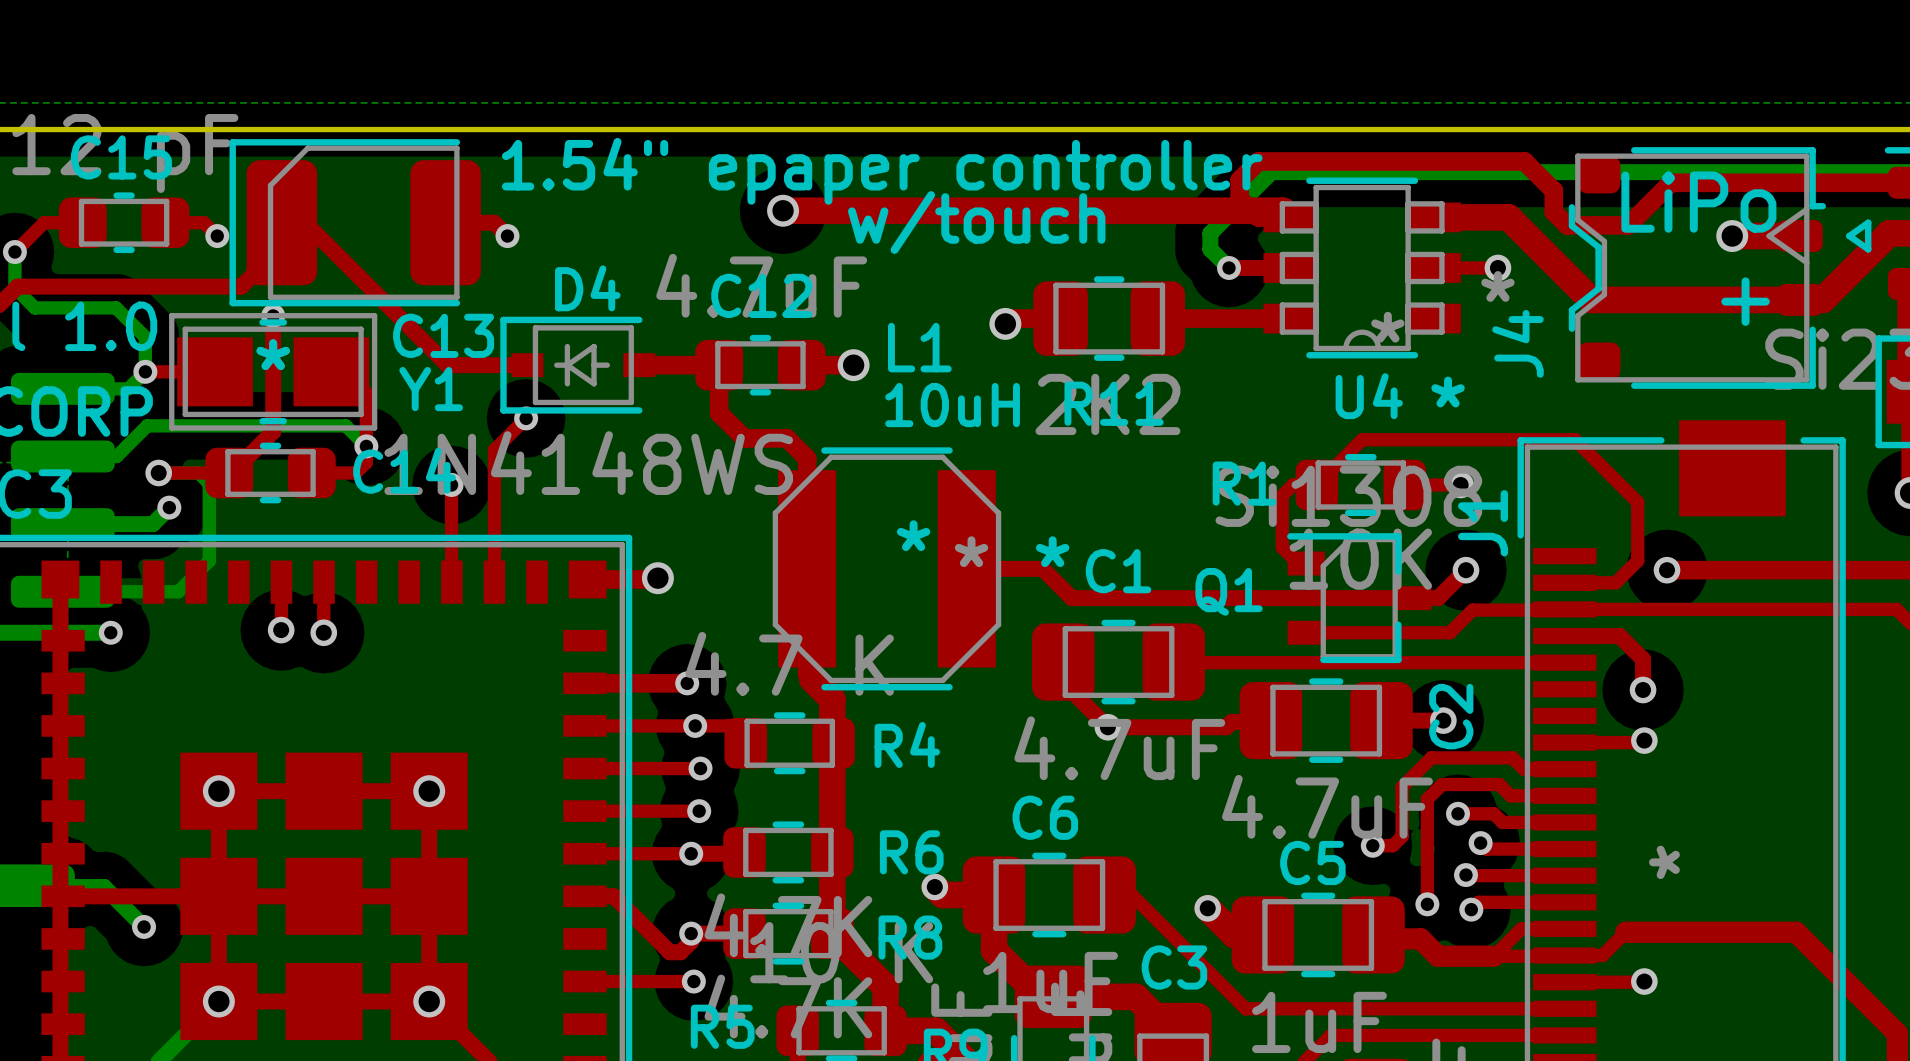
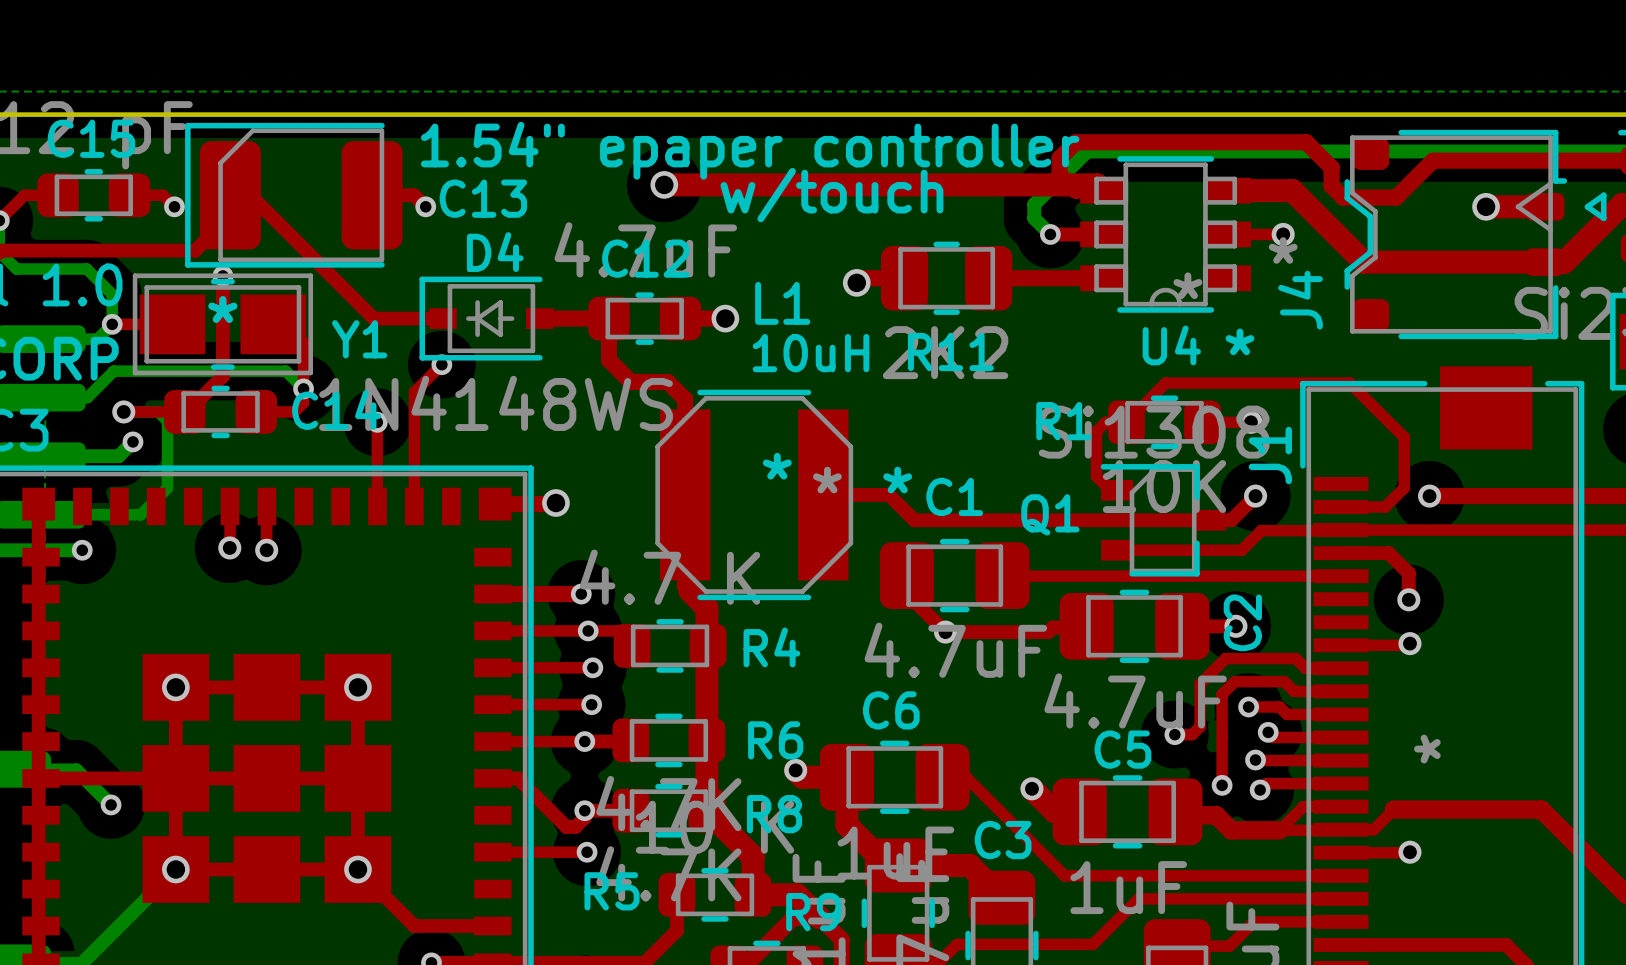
text: LiPo (1698, 202) -> none
text: + (1745, 301) -> none
C13 name position: C13 (443, 335) -> C13 (483, 198)

